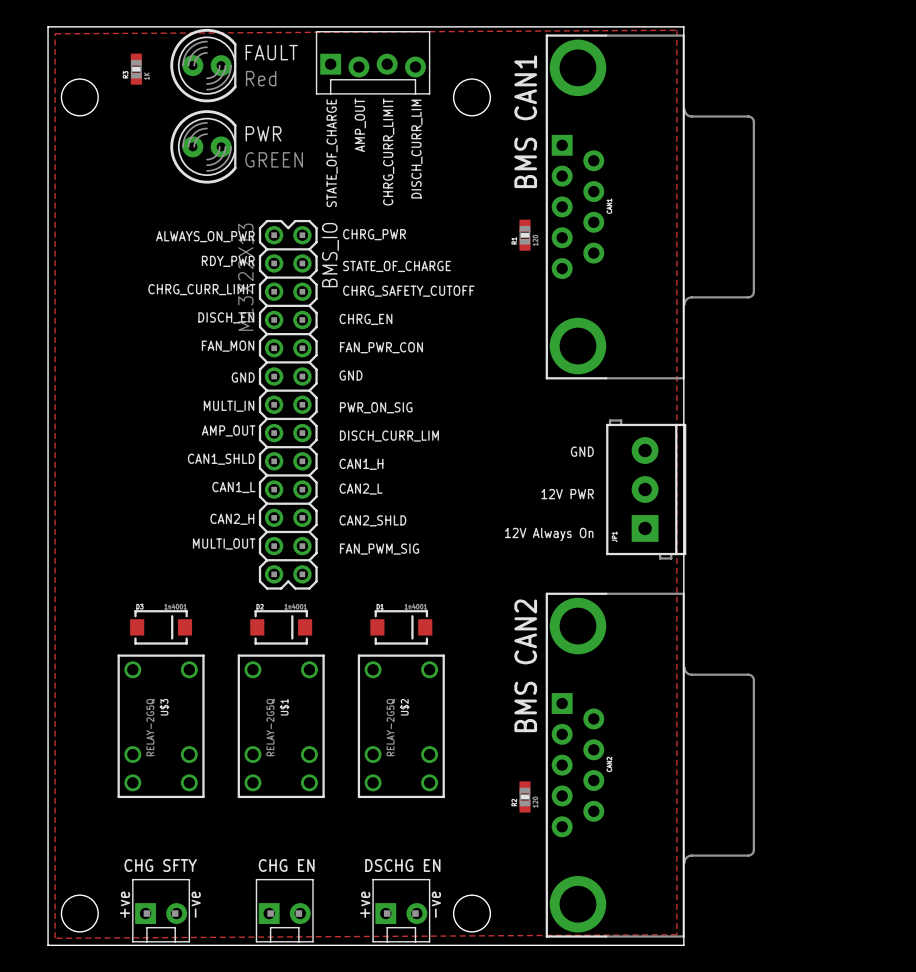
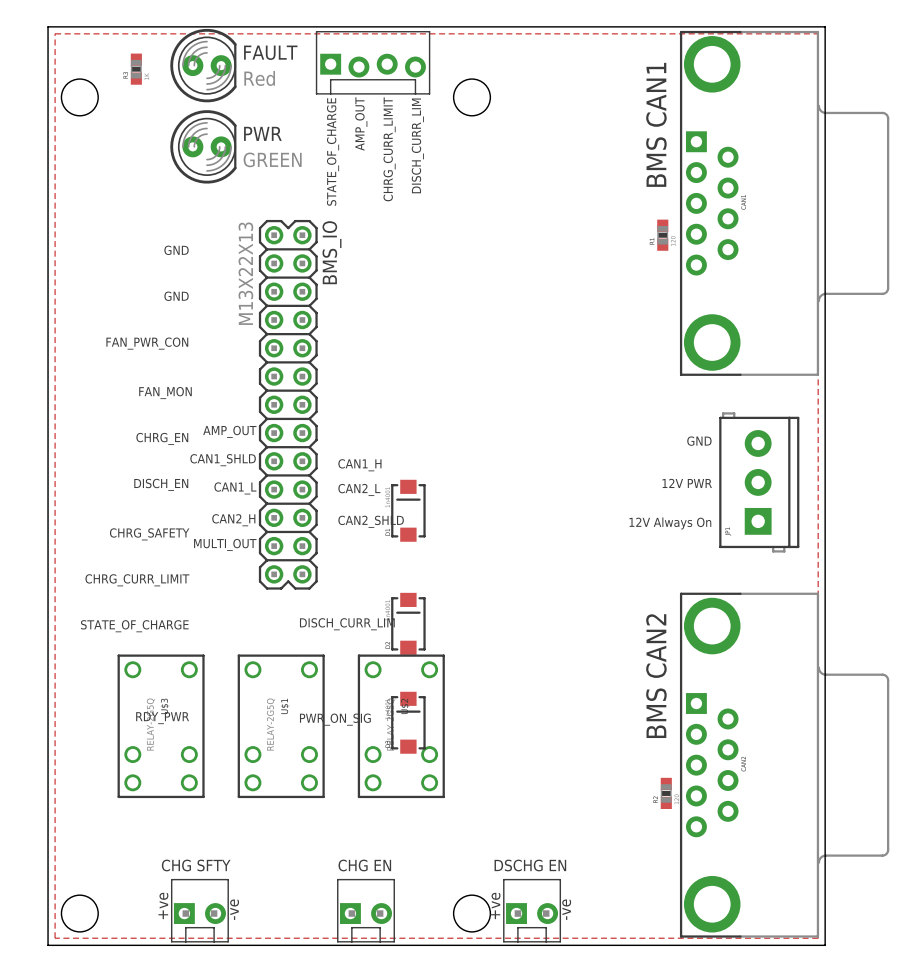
board edge: (683, 26) (683, 945) -> (683, 26) (825, 26) (825, 945) (683, 945)
zone outline: (55, 33) (676, 30) (676, 934) (55, 938) -> (55, 33) (818, 33) (818, 938) (55, 938)
text position: BMS CAN1 (525, 121) -> BMS CAN1 (656, 124)
part position: (650, 206) -> (784, 203)
text: CHRG_PWR (374, 234) -> none
part position: (524, 235) -> (662, 235)
text: ALWAYS_ON_PWR (205, 236) -> none
text: none -> GND (176, 250)
text: RDY_PWR (228, 261) -> none
text: STATE_OF_CHARGE (397, 266) -> none
text: CHRG_CURR_LIMIT (201, 289) -> none
text: CHRG_SAFETY_CUTOFF (408, 291) -> none
text: none -> GND (176, 296)
text position: DISCH_EN (226, 317) -> DISCH_EN (161, 484)
text position: CHRG_EN (365, 319) -> CHRG_EN (162, 438)
text position: FAN_MON (228, 346) -> FAN_MON (165, 393)
text position: FAN_PWR_CON (381, 347) -> FAN_PWR_CON (147, 343)
text: GND (351, 375) -> none
text: GND (243, 377) -> none
text: MULTI_IN (229, 406) -> none
text: PWR_ON_SIG (376, 407) -> none
text position: DISCH_CURR_LIM (389, 436) -> DISCH_CURR_LIM (347, 624)
text position: GND (582, 451) -> GND (699, 441)
part position: (646, 489) -> (759, 482)
text position: 12V PWR (567, 494) -> 12V PWR (687, 483)
text: none -> CHRG_SAFETY (149, 534)
text position: 12V Always On (549, 534) -> 12V Always On (670, 523)
text: FAN_PWM_SIG (379, 549) -> none
text: none -> CHRG_CURR_LIMIT (137, 580)
text: none -> STATE_OF_CHARGE (134, 626)
part rotation: 0° (161, 627) -> 90° counterclockwise (408, 722)
part position: (161, 627) -> (408, 722)
part rotation: 0° (281, 627) -> 90° counterclockwise (408, 623)
part position: (281, 627) -> (408, 623)
part rotation: 0° (401, 627) -> 90° counterclockwise (408, 510)
part position: (401, 627) -> (408, 510)
text position: BMS CAN2 (525, 665) -> BMS CAN2 (656, 676)
text: none -> RDY_PWR (162, 718)
text: none -> PWR_ON_SIG (335, 719)
part position: (650, 765) -> (784, 765)
part position: (524, 796) -> (666, 793)
text position: CHG SFTY (160, 865) -> CHG SFTY (196, 865)
text position: CHG EN (286, 865) -> CHG EN (364, 865)
text position: DSCHG EN (402, 865) -> DSCHG EN (530, 865)
text position: +ve (124, 904) -> +ve (163, 905)
text position: -ve (196, 904) -> -ve (234, 909)
text: +ve (365, 904) -> none
text: -ve (436, 904) -> none
text: none -> +ve (495, 905)
text: none -> -ve (566, 909)
part position: (161, 910) -> (199, 910)
part: (284, 910) -> none
part position: (401, 910) -> (366, 910)
part: none -> (532, 910)

